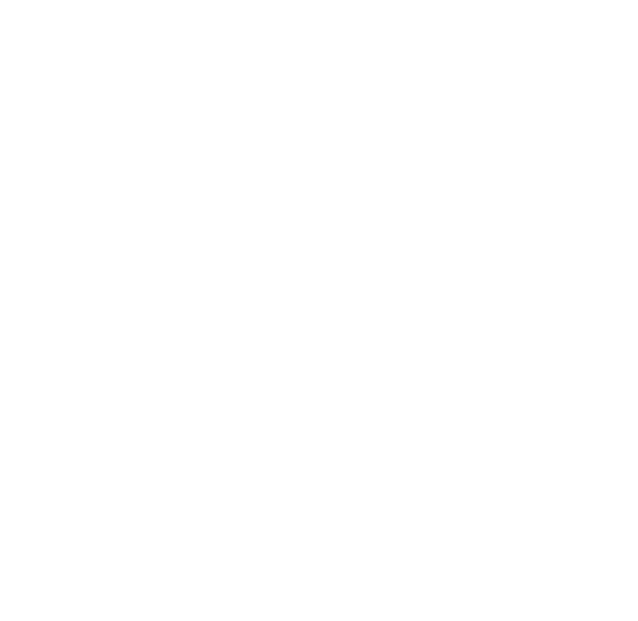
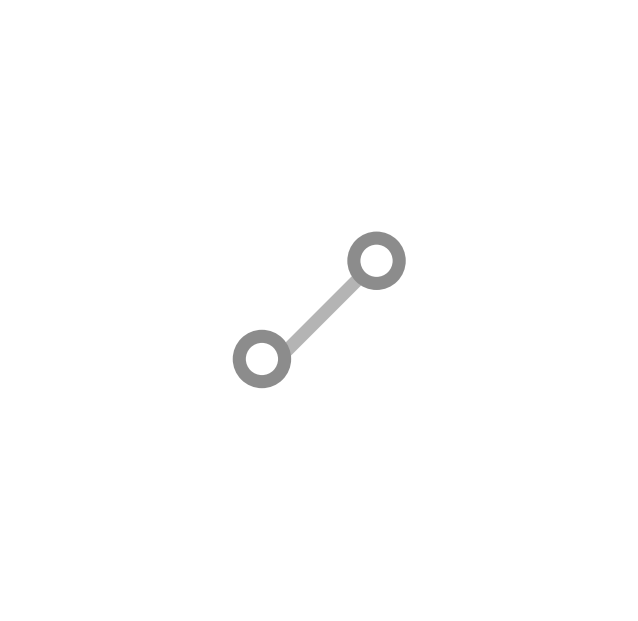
track: none -> (376, 260) (278, 358) (261, 358)
via: none -> (376, 260)
via: none -> (261, 358)

